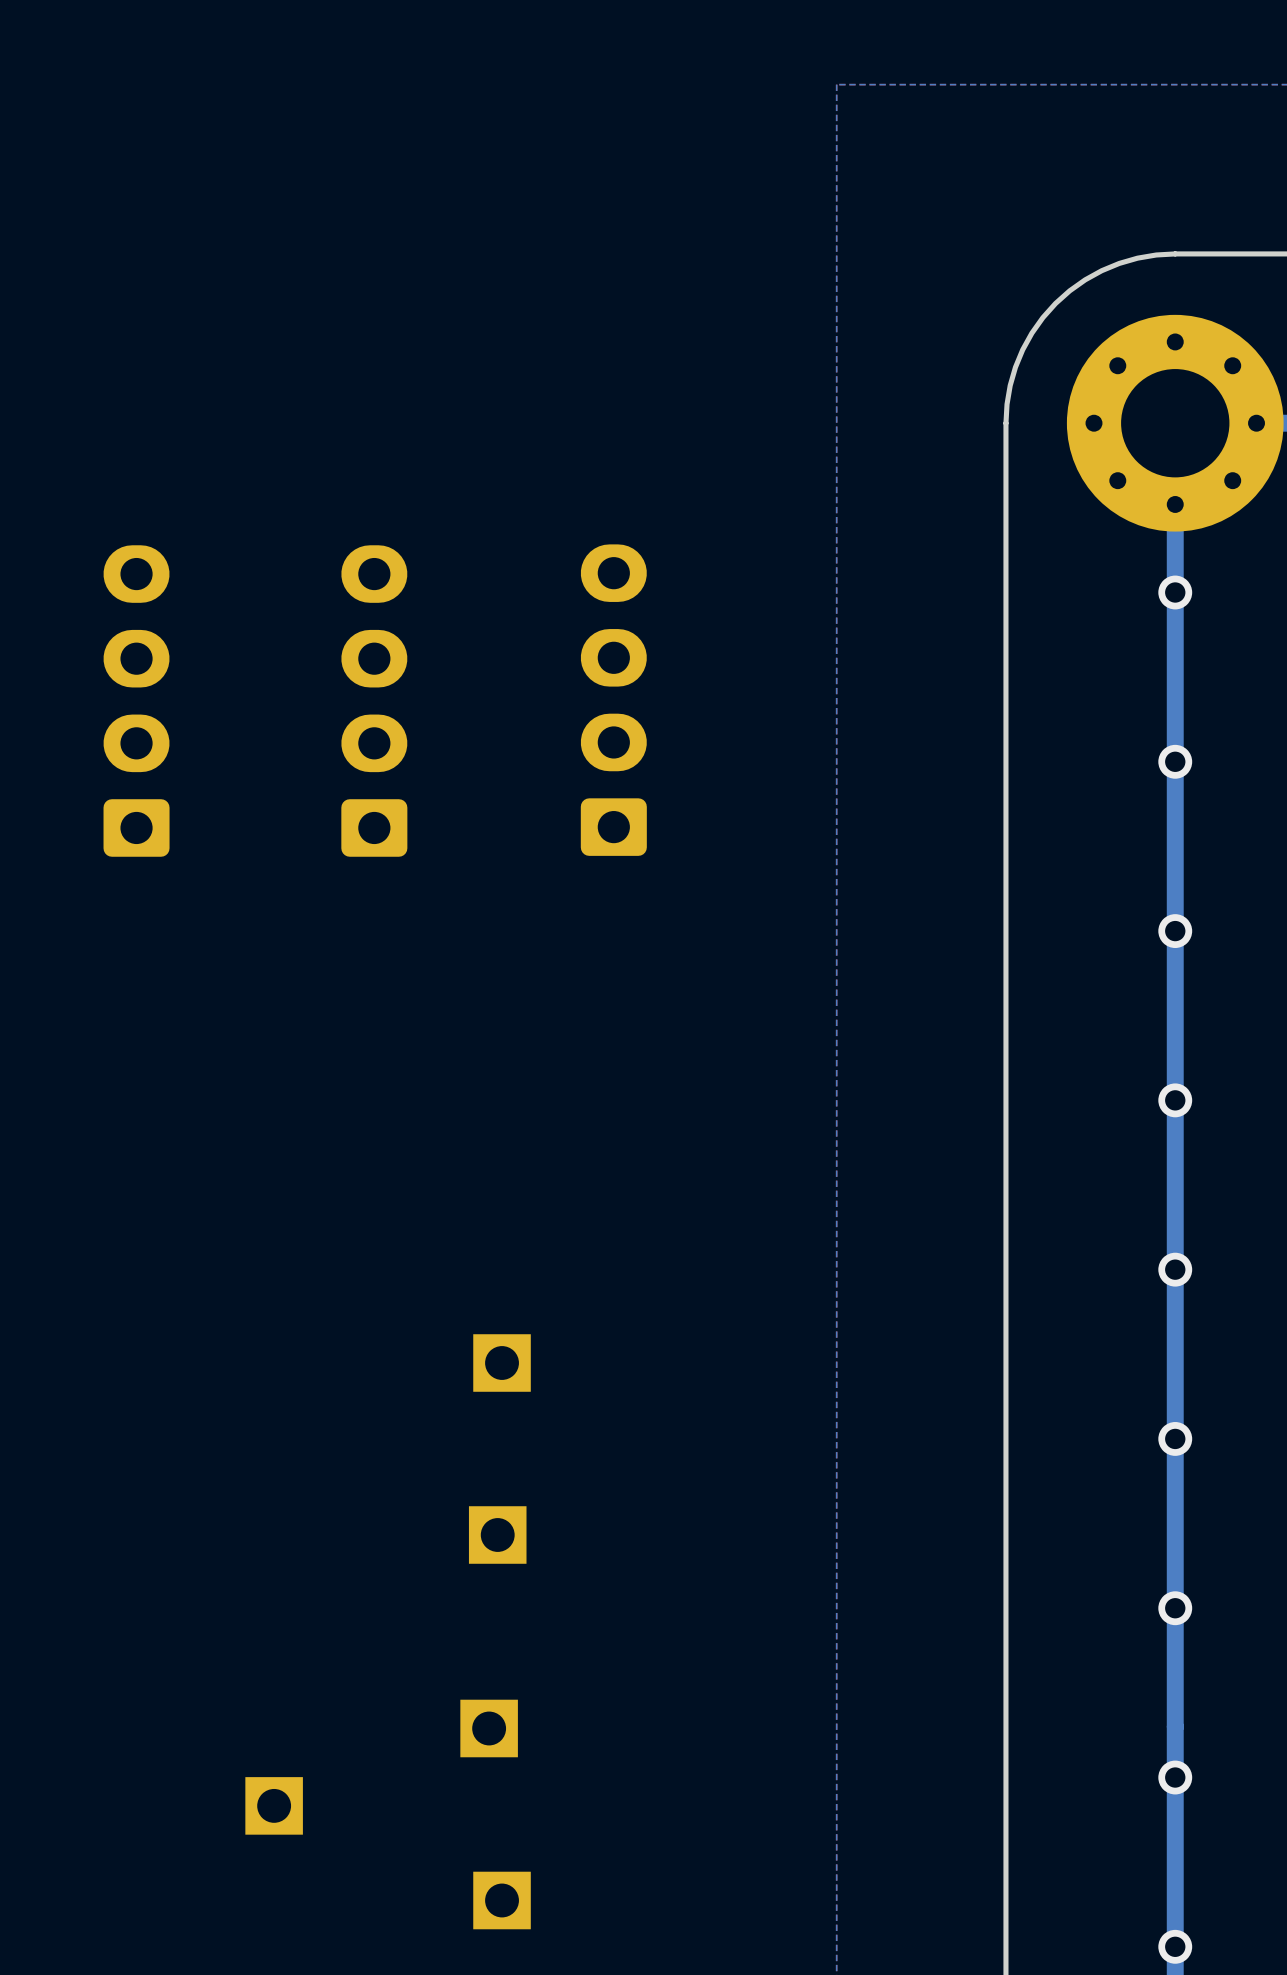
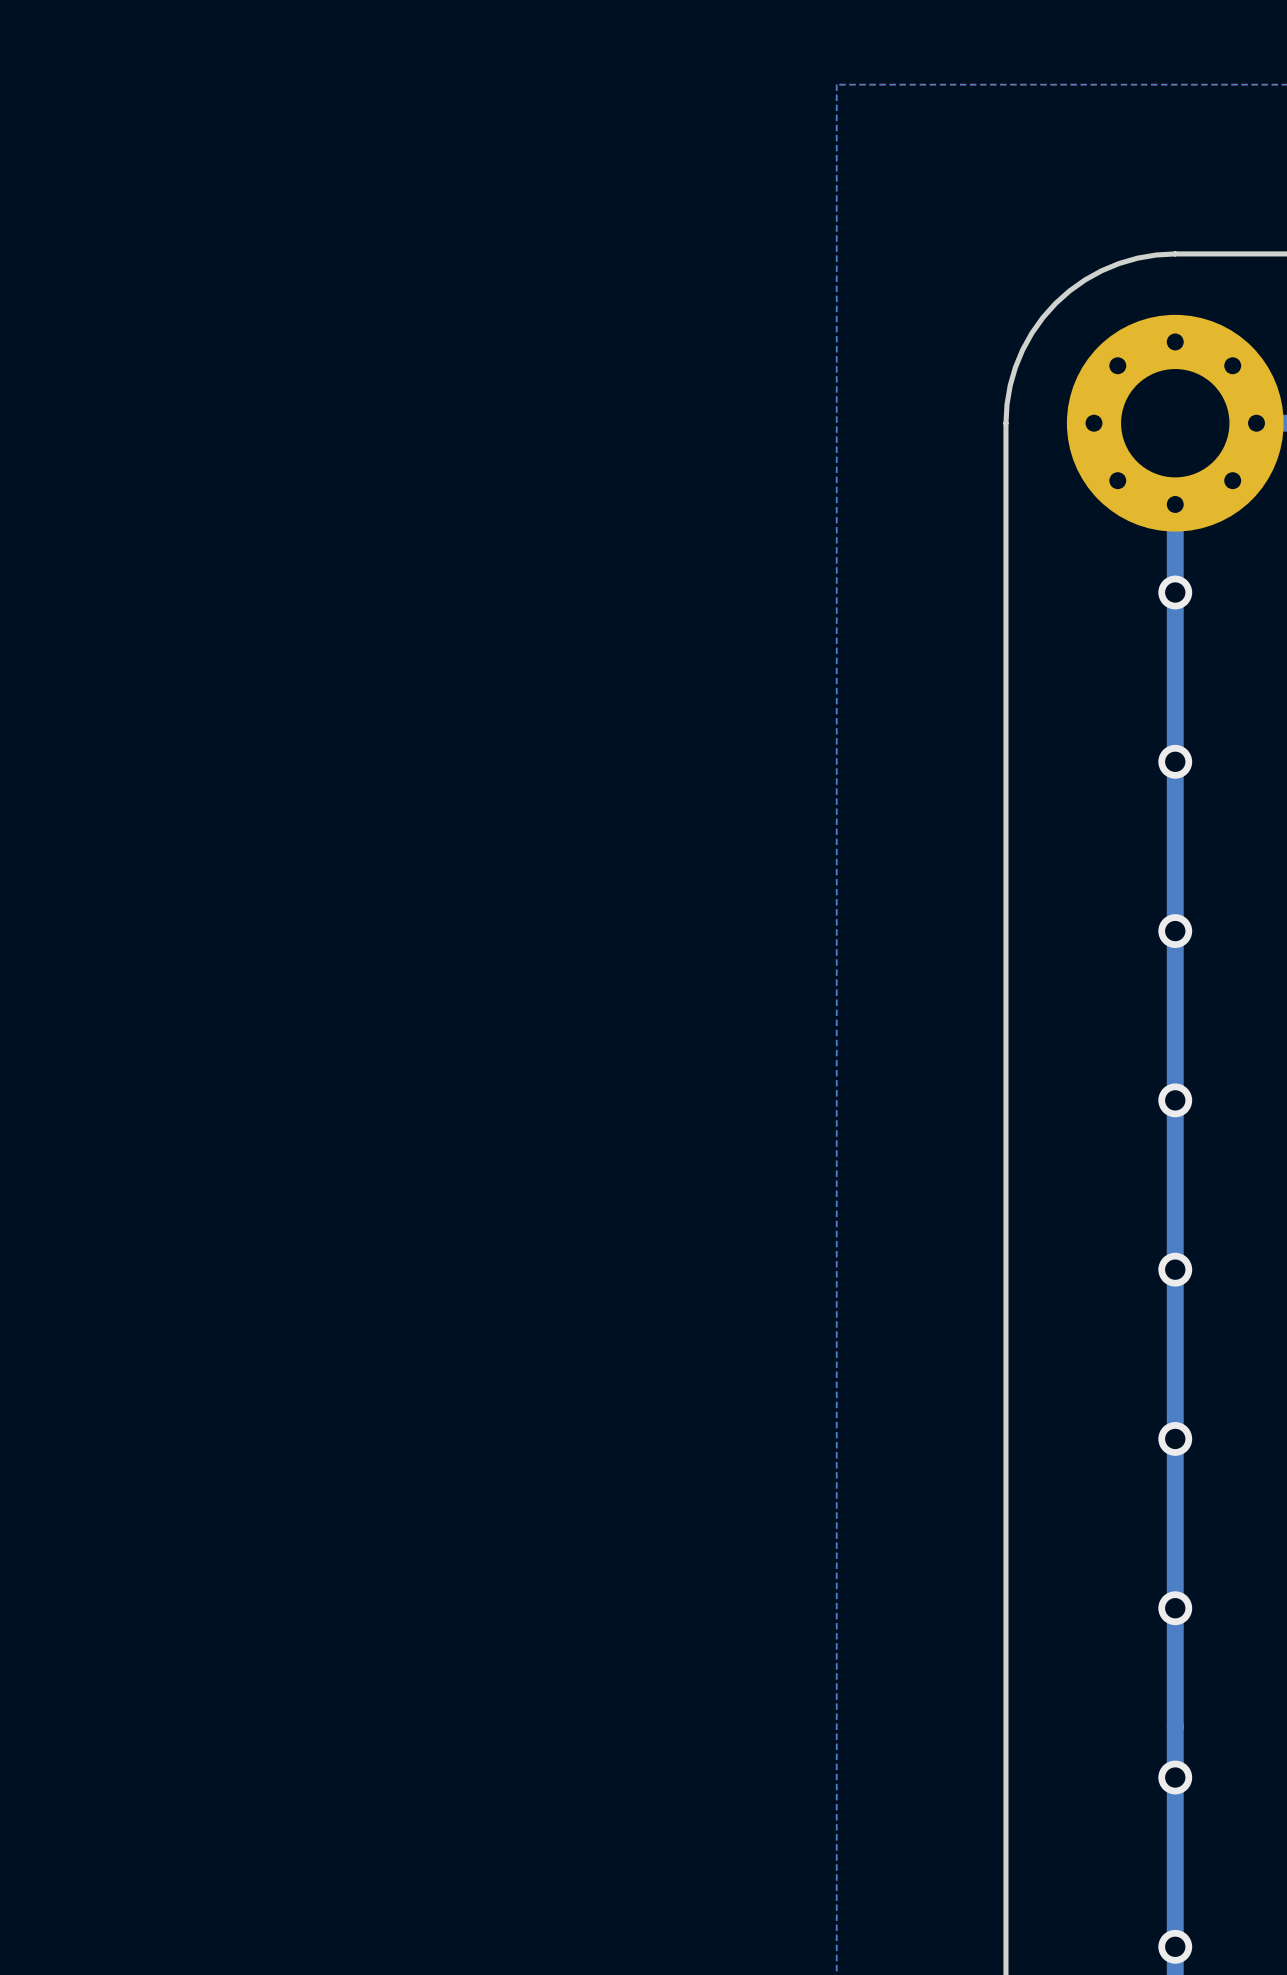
part: (613, 700) -> none
part: (136, 701) -> none
part: (374, 701) -> none
part: (502, 1363) -> none
part: (497, 1535) -> none
part: (489, 1728) -> none
part: (274, 1805) -> none
part: (502, 1900) -> none

